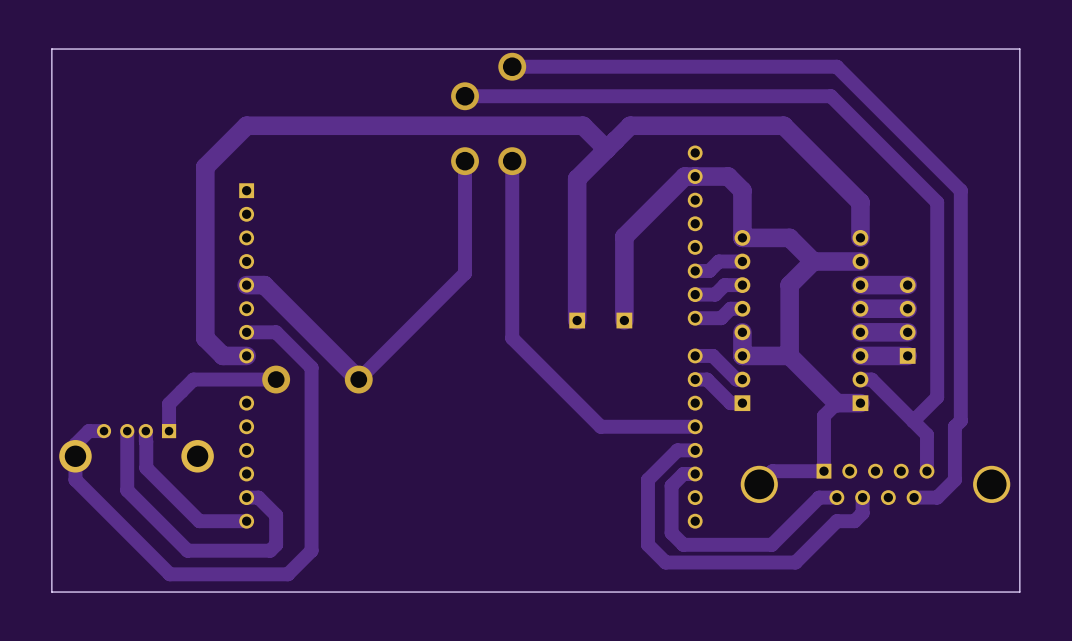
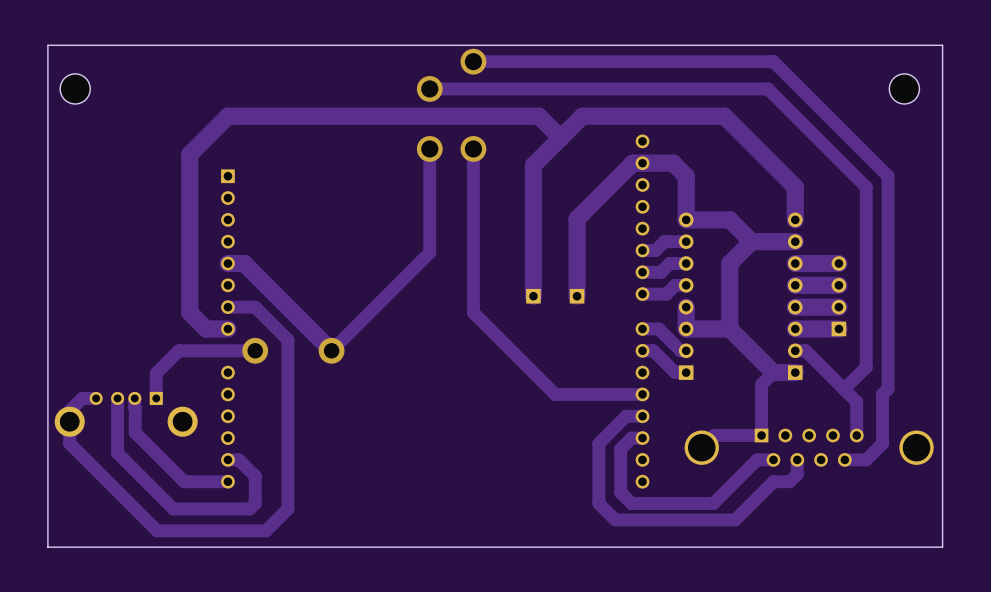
part: none -> (75, 88)
part: none -> (904, 88)

